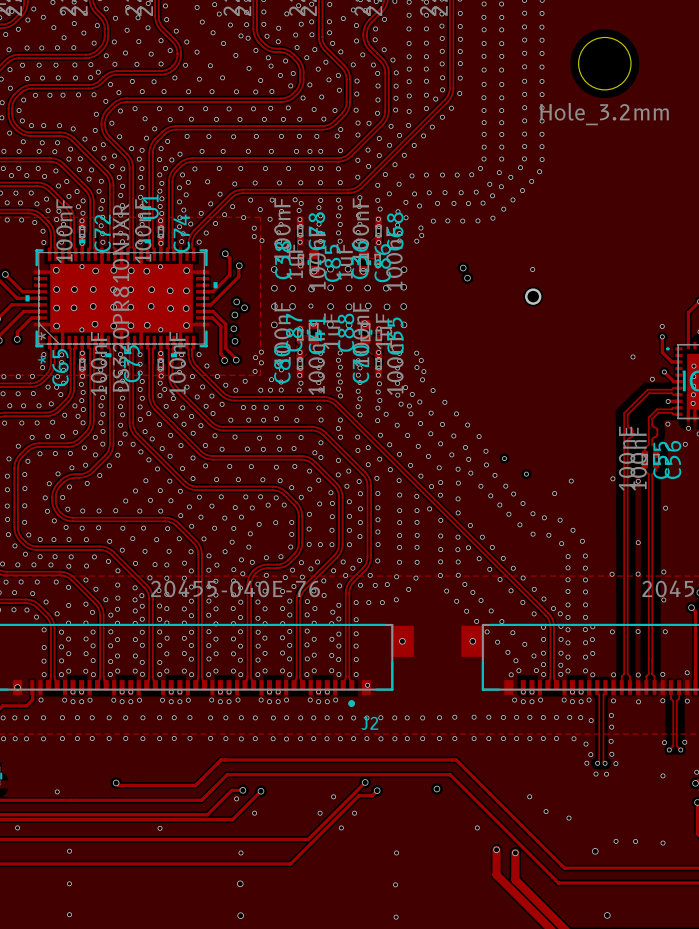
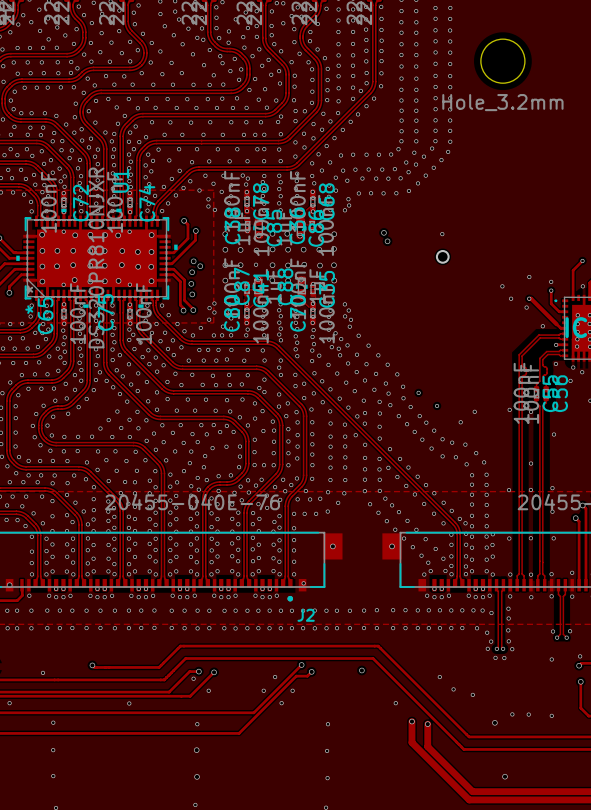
via: none -> (529, 277)
via: none -> (502, 286)
via: none -> (511, 298)
via: none -> (529, 298)
track: (664, 372) (673, 381) -> (529, 298) (560, 328)
via: (664, 372) -> none

